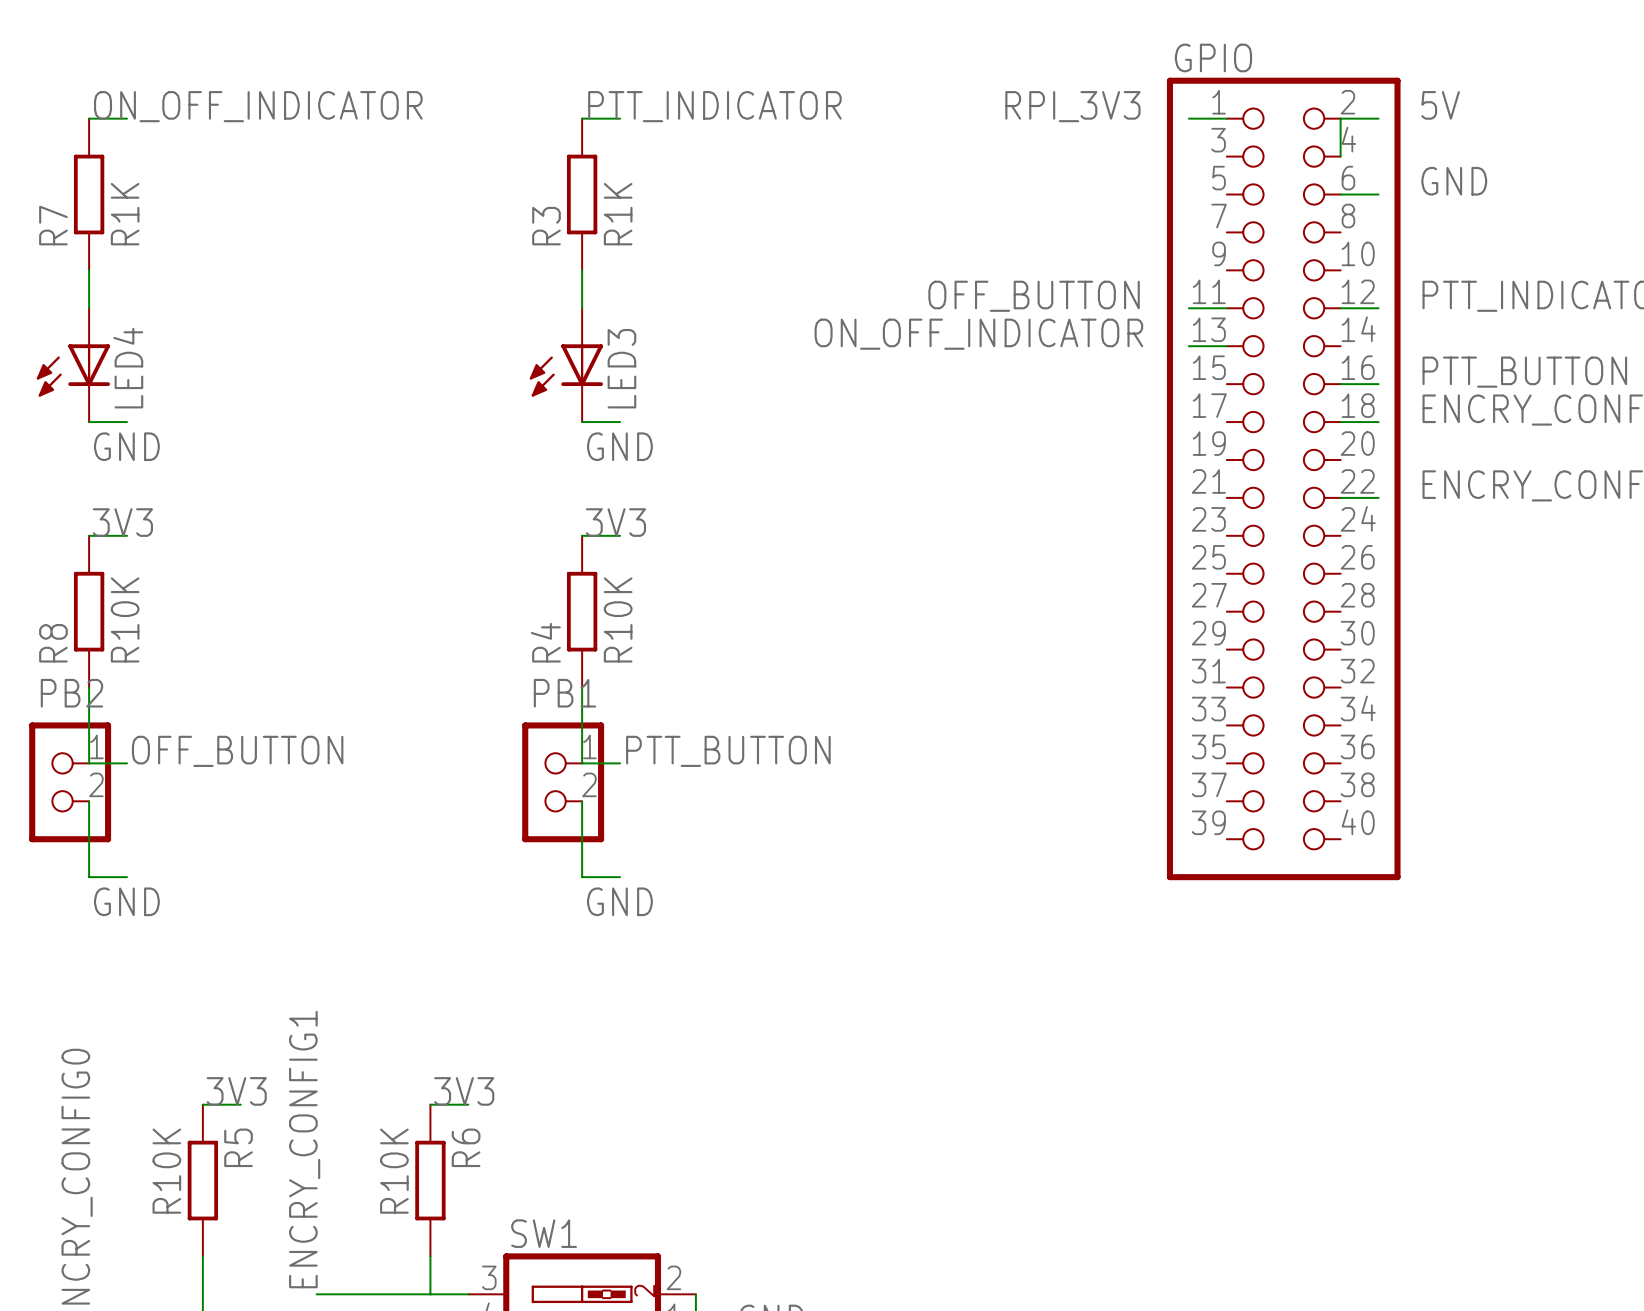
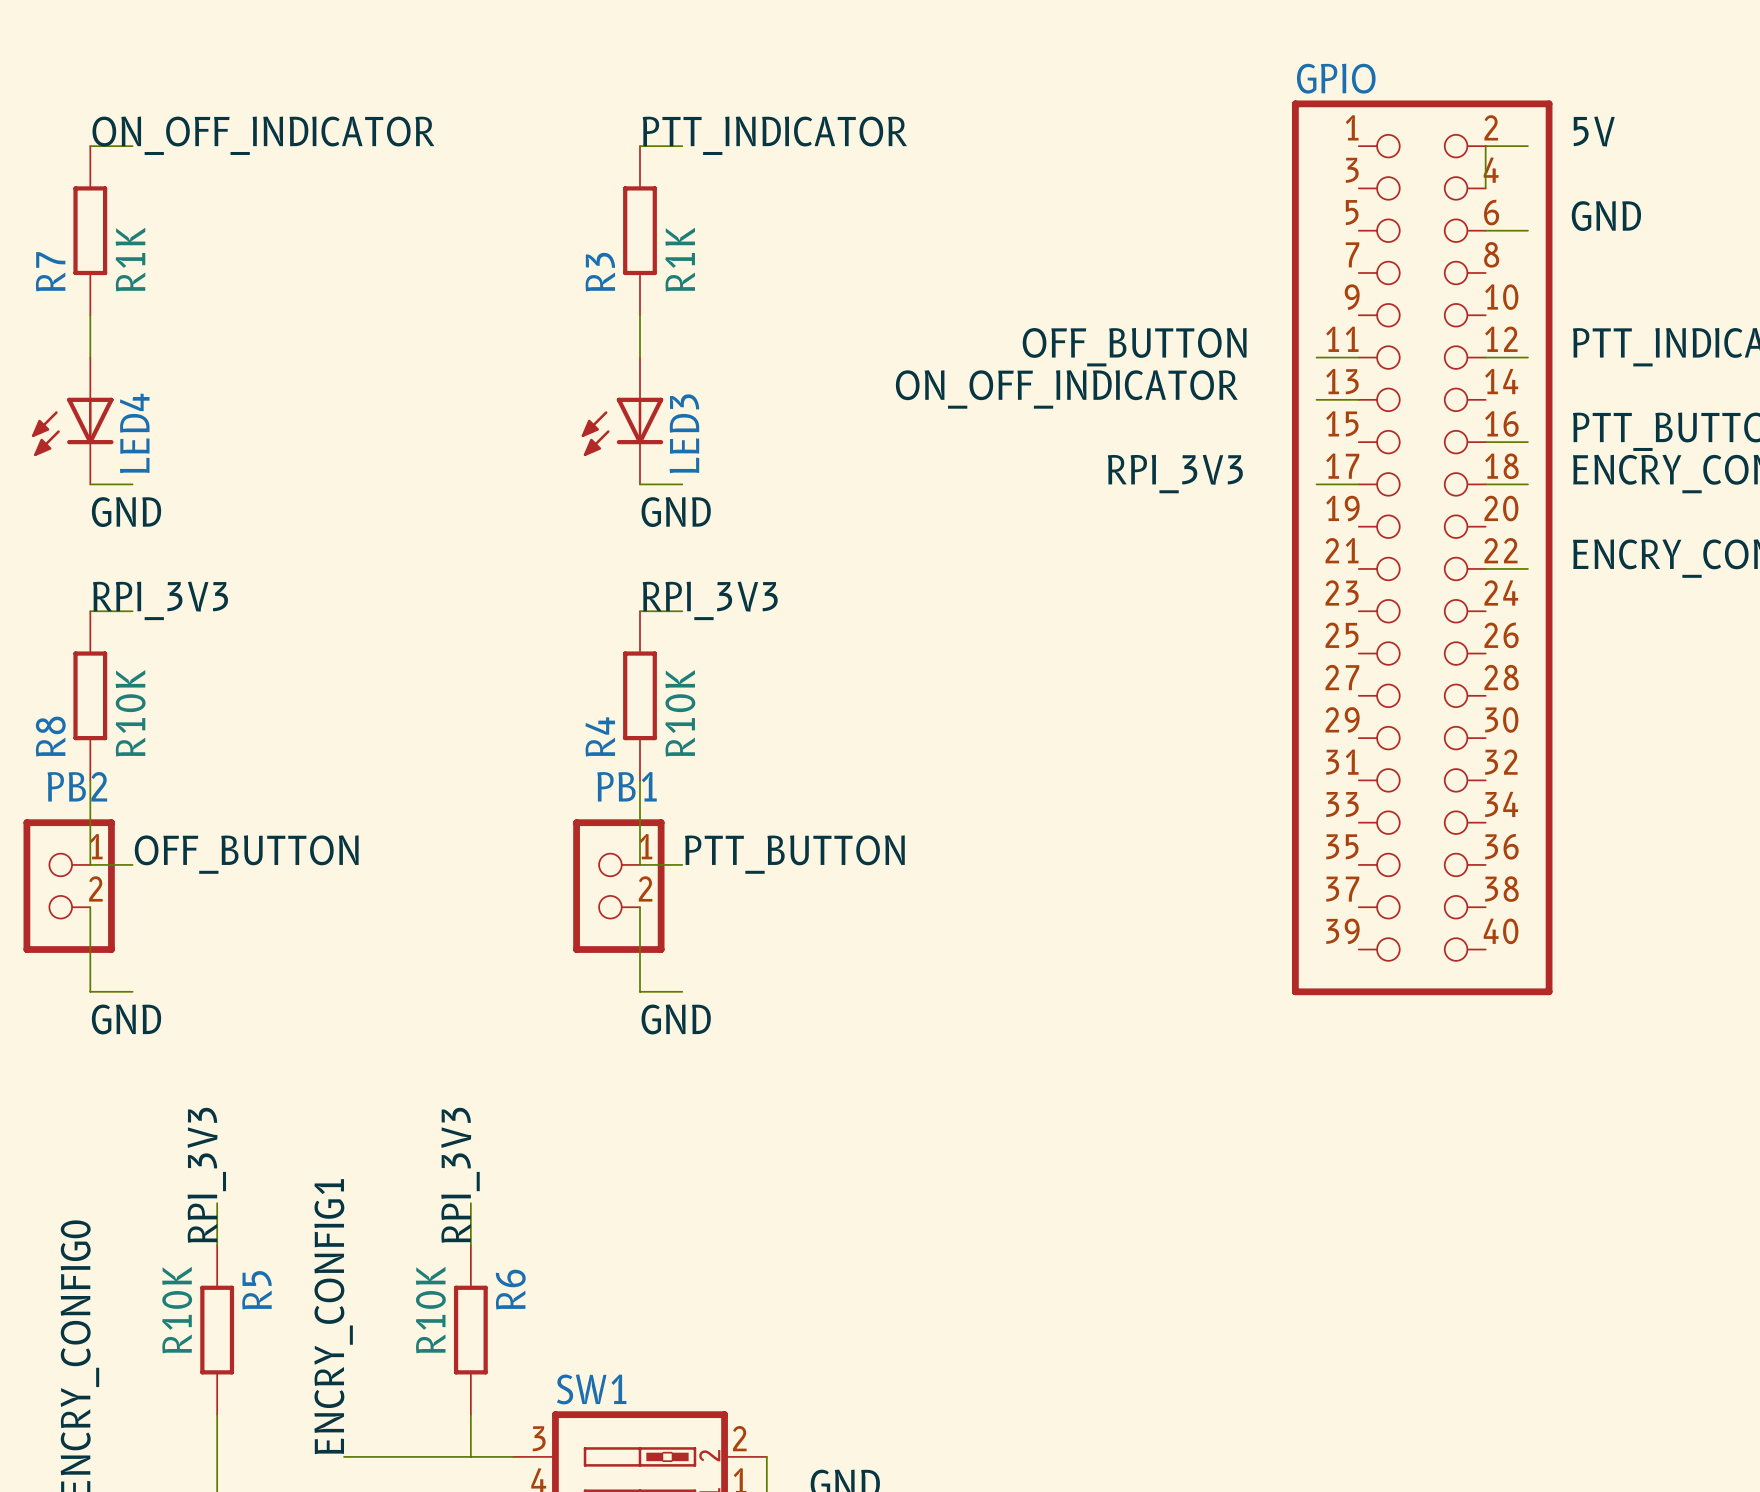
label position: RPI_3V3 (1072, 106) -> RPI_3V3 (1175, 474)
wire: (1188, 118) (1226, 118) -> (1316, 484) (1358, 484)
label: 3V3 (122, 522) -> RPI_3V3 (160, 600)
label: 3V3 (615, 522) -> RPI_3V3 (710, 600)
label: 3V3 (236, 1091) -> RPI_3V3 (206, 1175)
label: 3V3 (464, 1091) -> RPI_3V3 (460, 1175)
wire: (202, 1104) (240, 1104) -> (217, 1245) (217, 1203)
wire: (430, 1104) (468, 1104) -> (470, 1245) (470, 1203)

